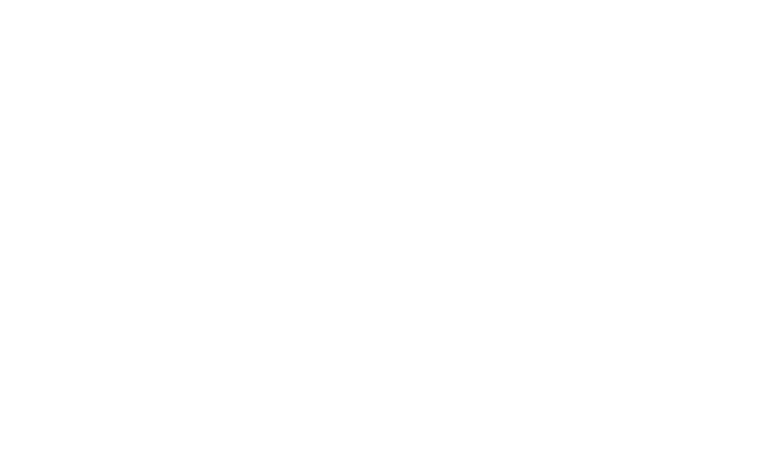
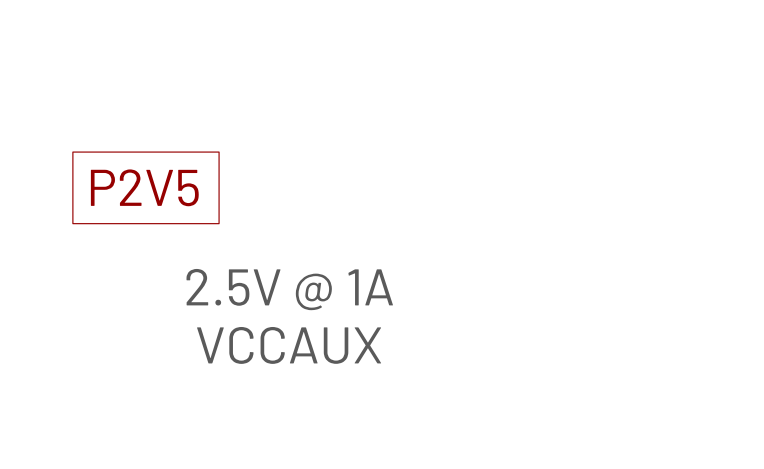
global label: none -> P2V5 (144, 187)
text: none -> 2.5V @ 1A (289, 289)
text: none -> VCCAUX (289, 345)

